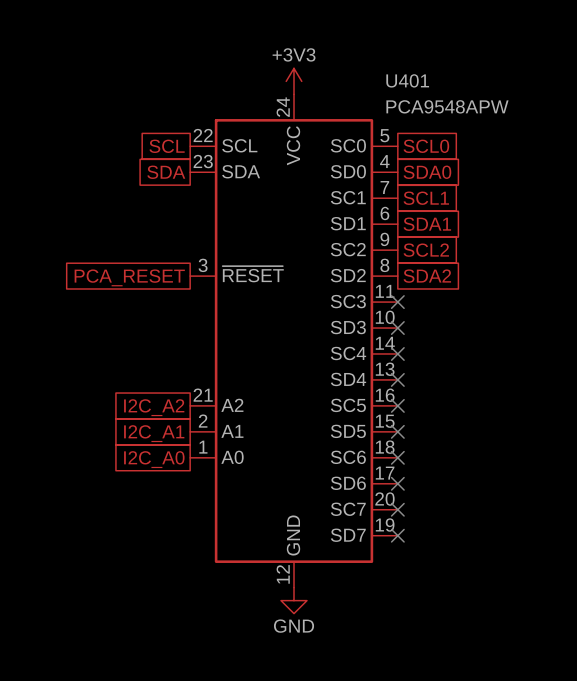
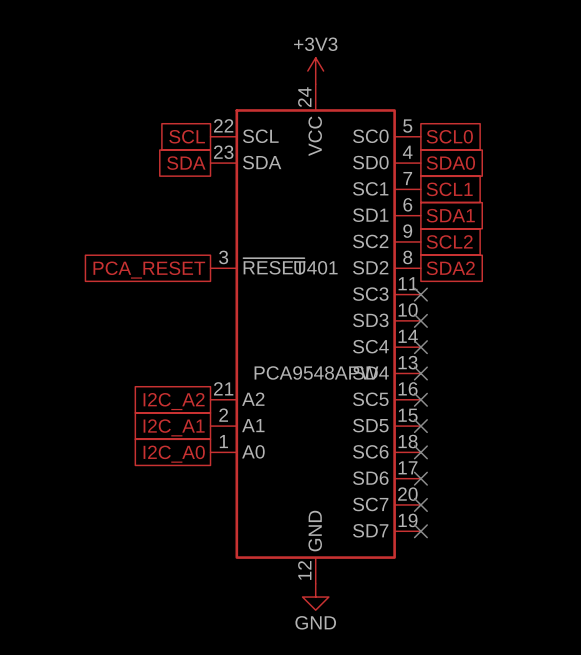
U401 name position: U401 (407, 80) -> U401 (315, 267)
U401 value position: PCA9548APW (447, 106) -> PCA9548APW (316, 372)

